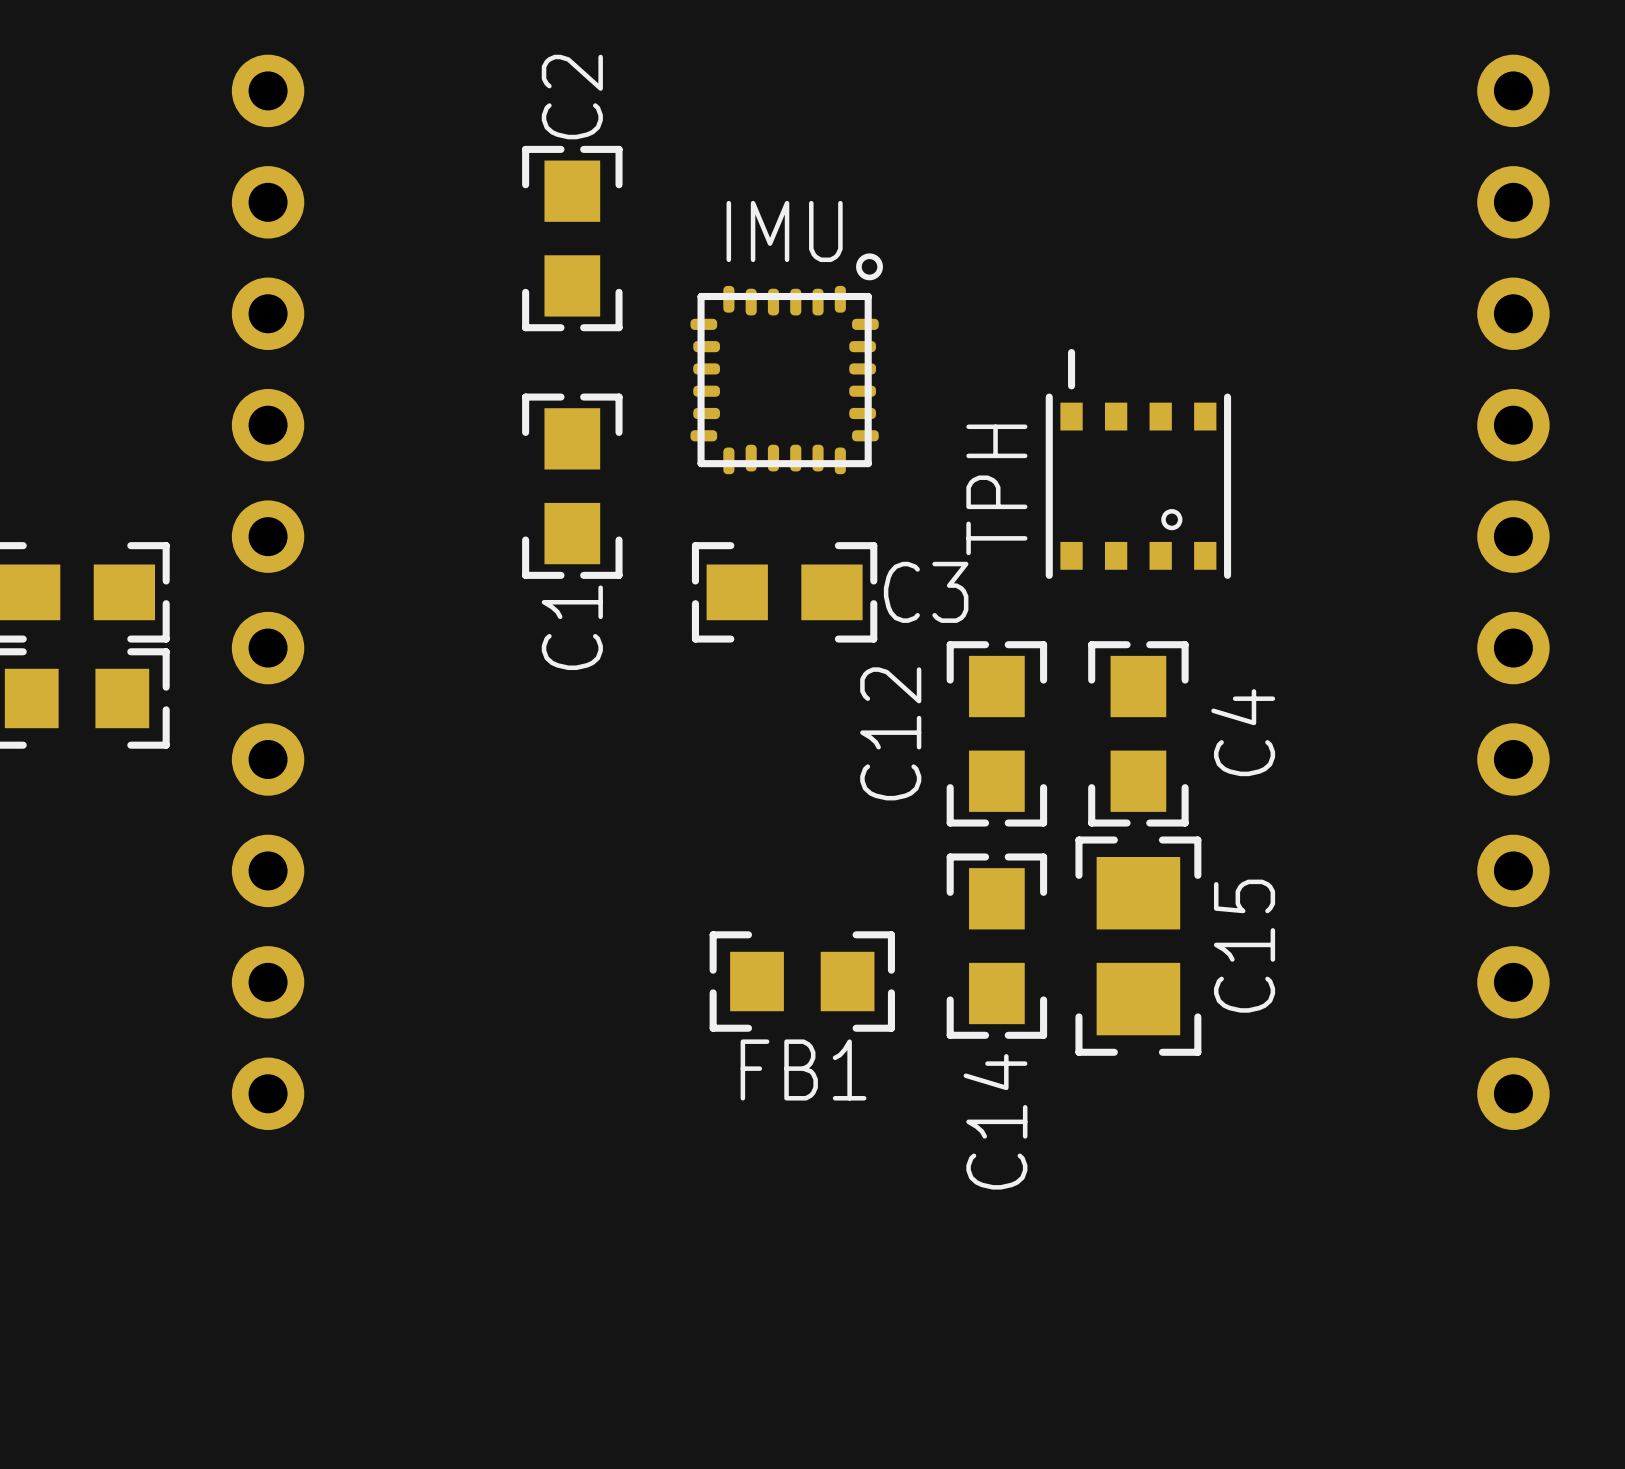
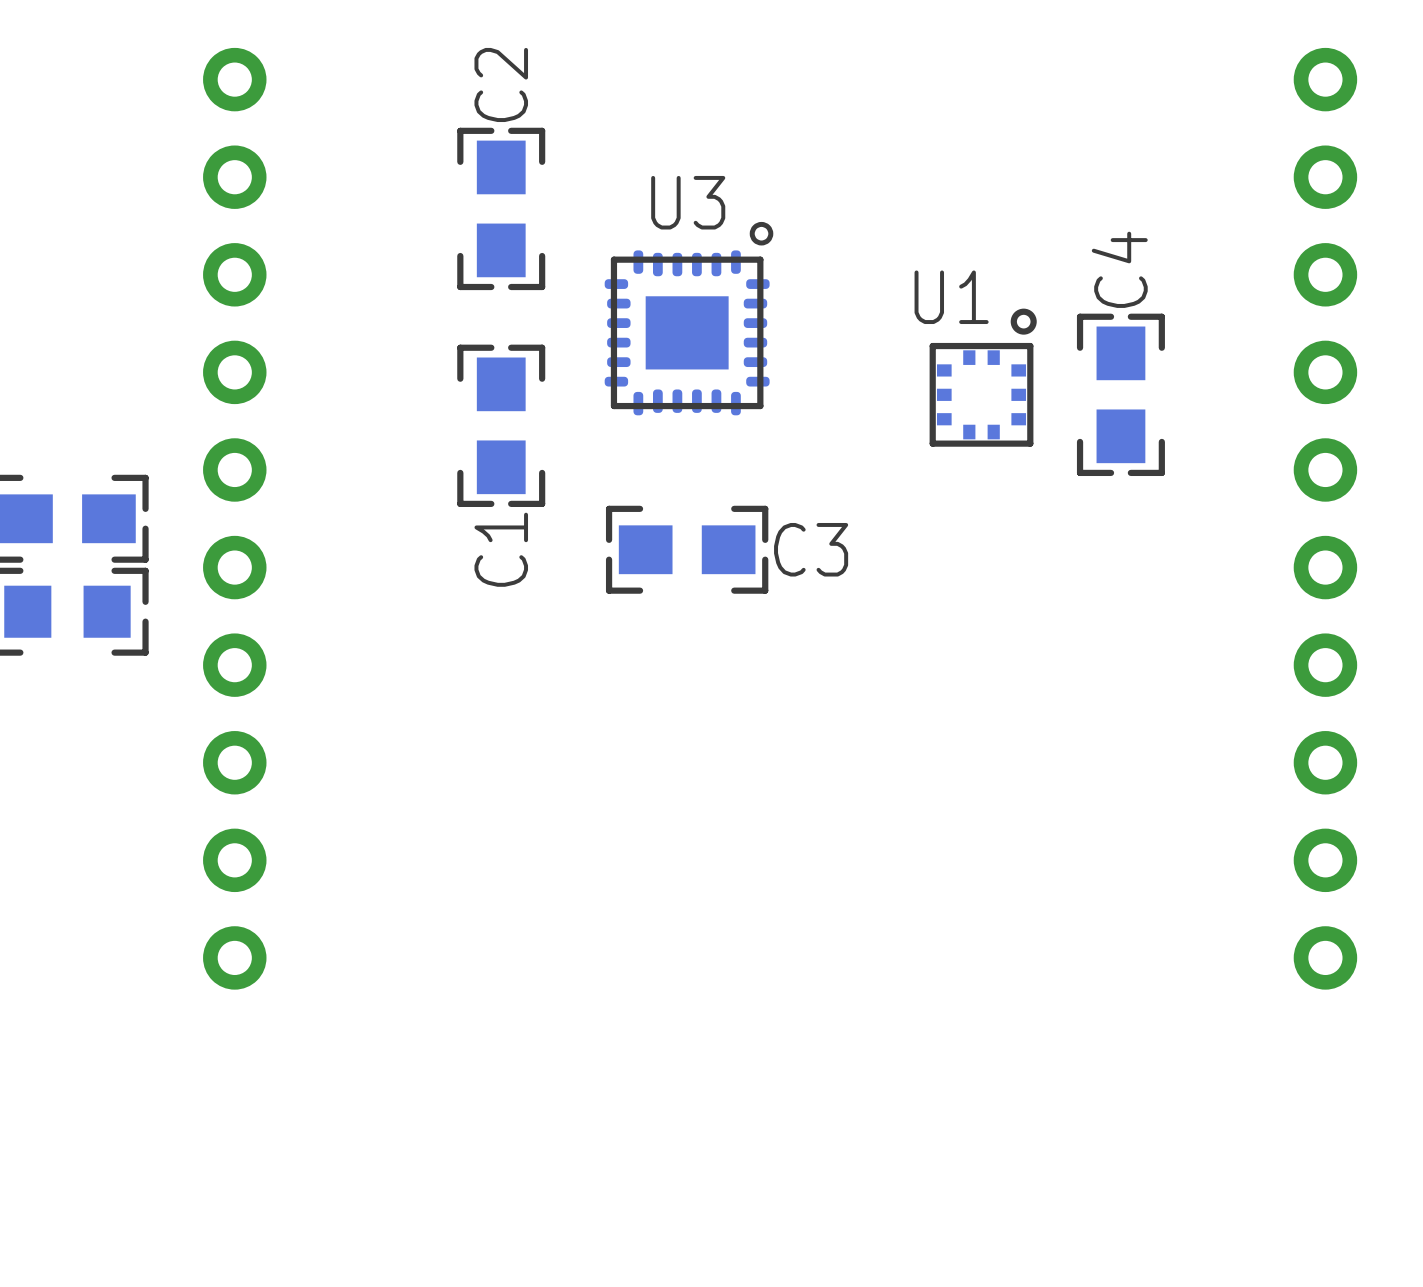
IMU: (786, 363) -> none
U3: none -> (688, 318)
U1: none -> (983, 377)
TPH: (1138, 463) -> none
C3 position: (784, 592) -> (687, 549)
C4 name position: C4 (1243, 732) -> C4 (1119, 269)
C12: (996, 733) -> none
C4 position: (1138, 733) -> (1120, 394)
C14: (996, 946) -> none
C15: (1138, 946) -> none
FB1: (802, 981) -> none

